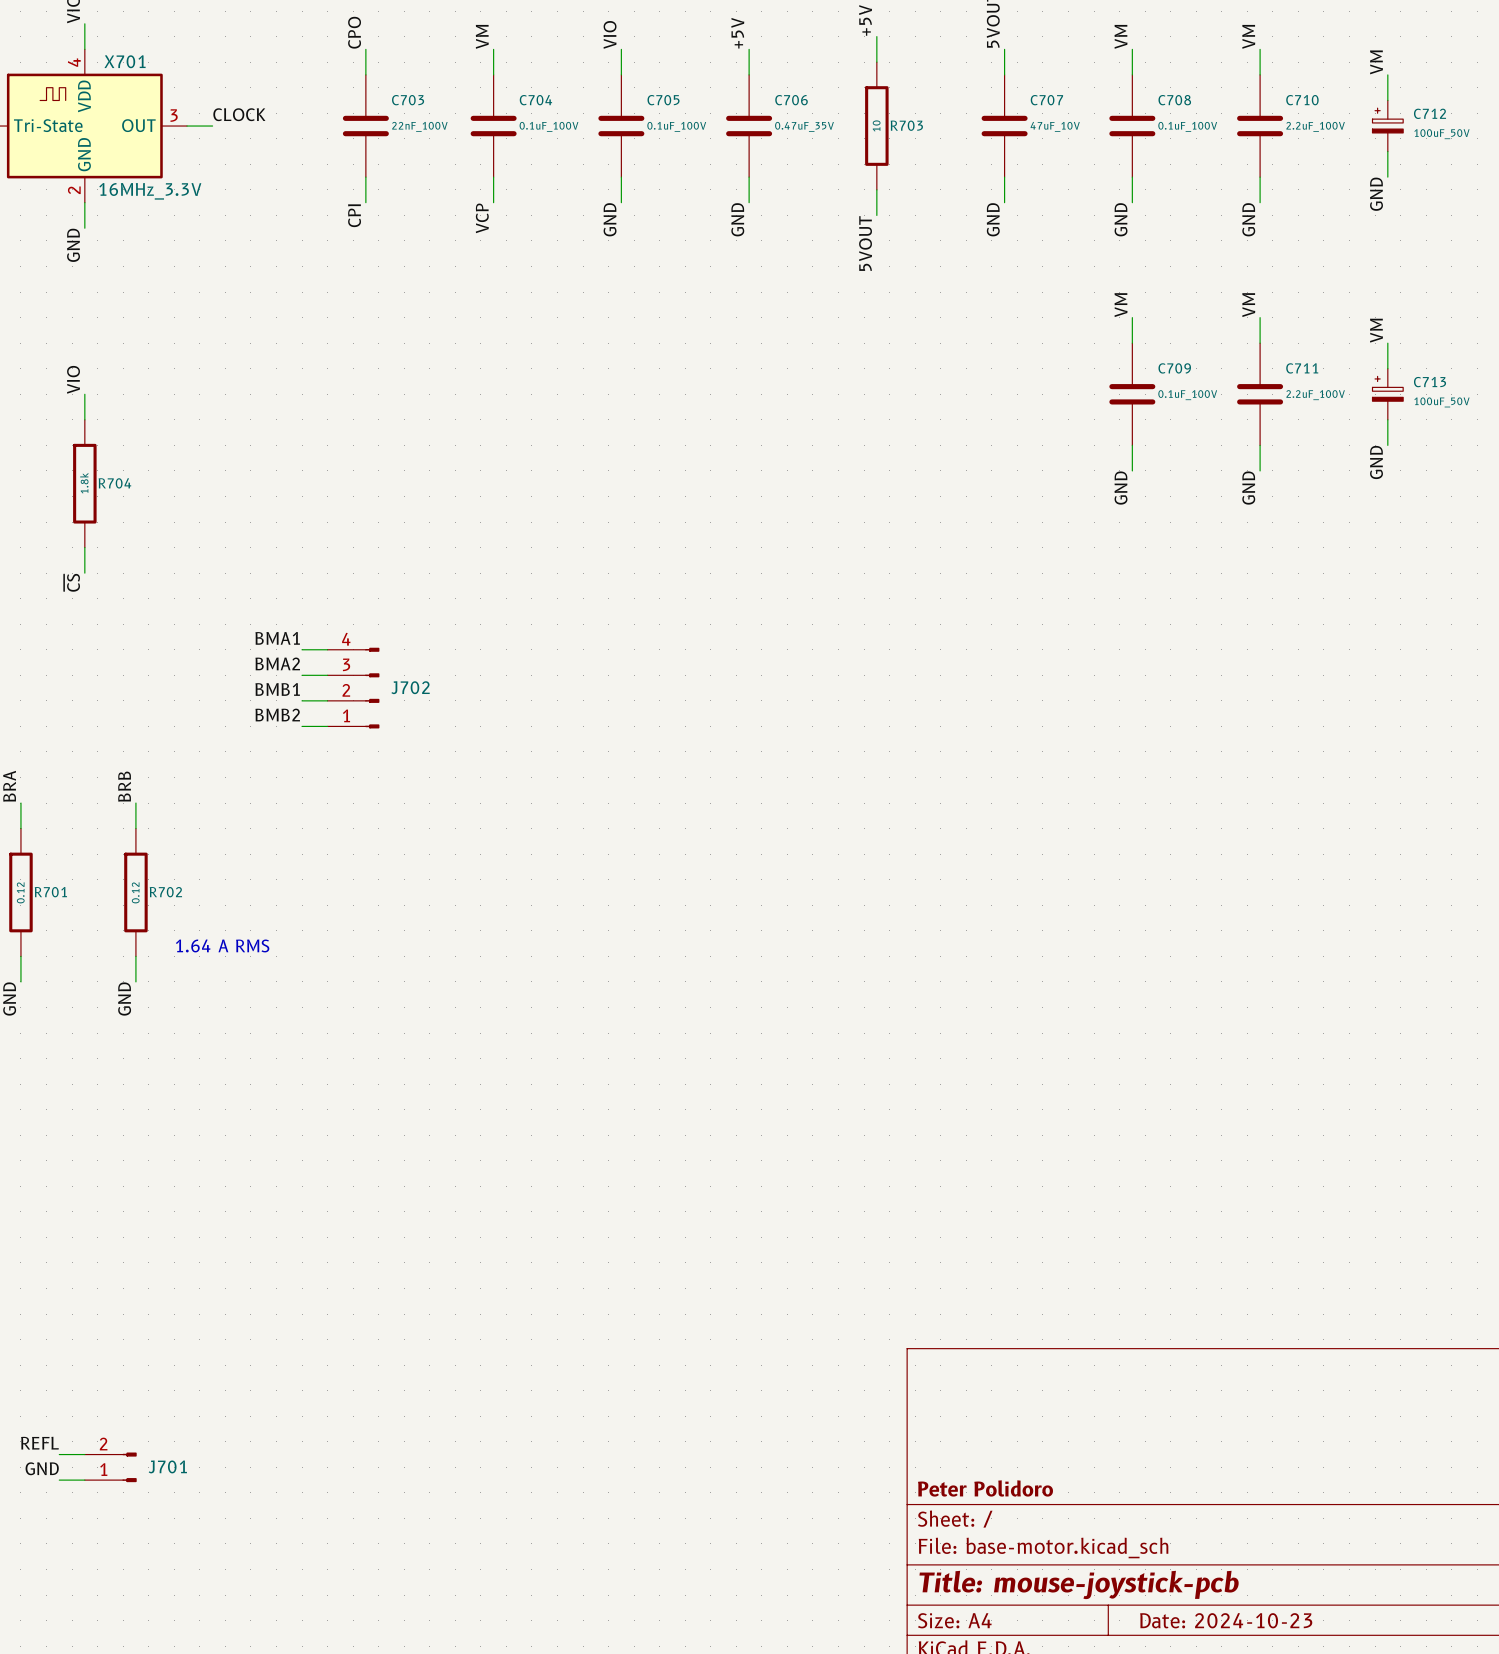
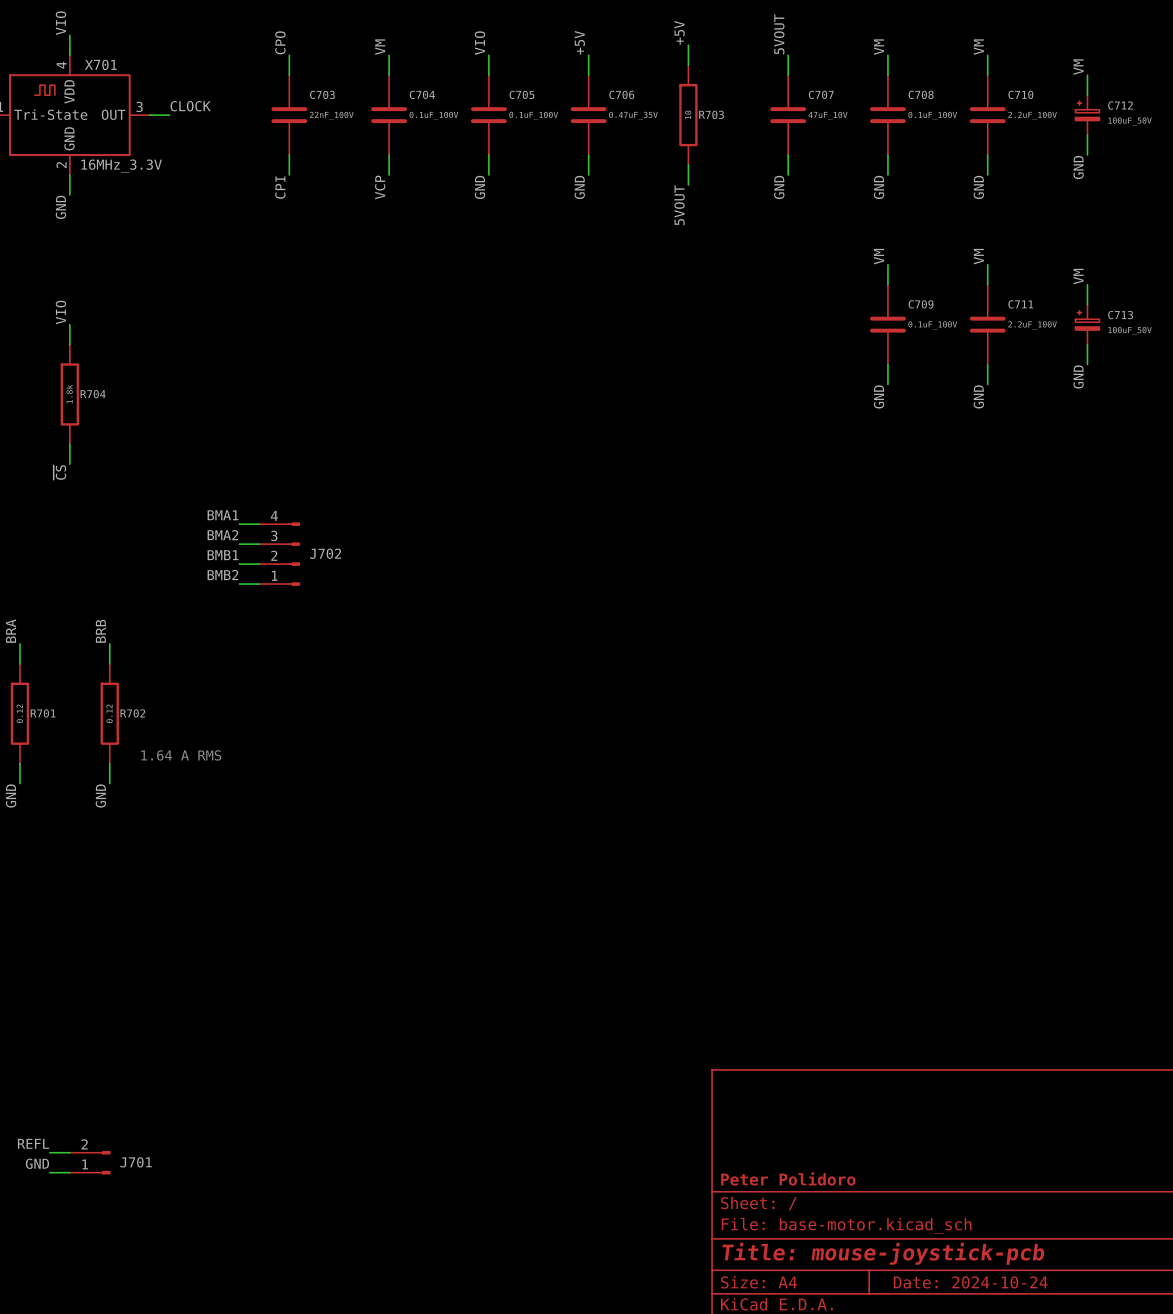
title block: Date: 2024-10-23 (1226, 1620) -> Date: 2024-10-24 (970, 1282)

